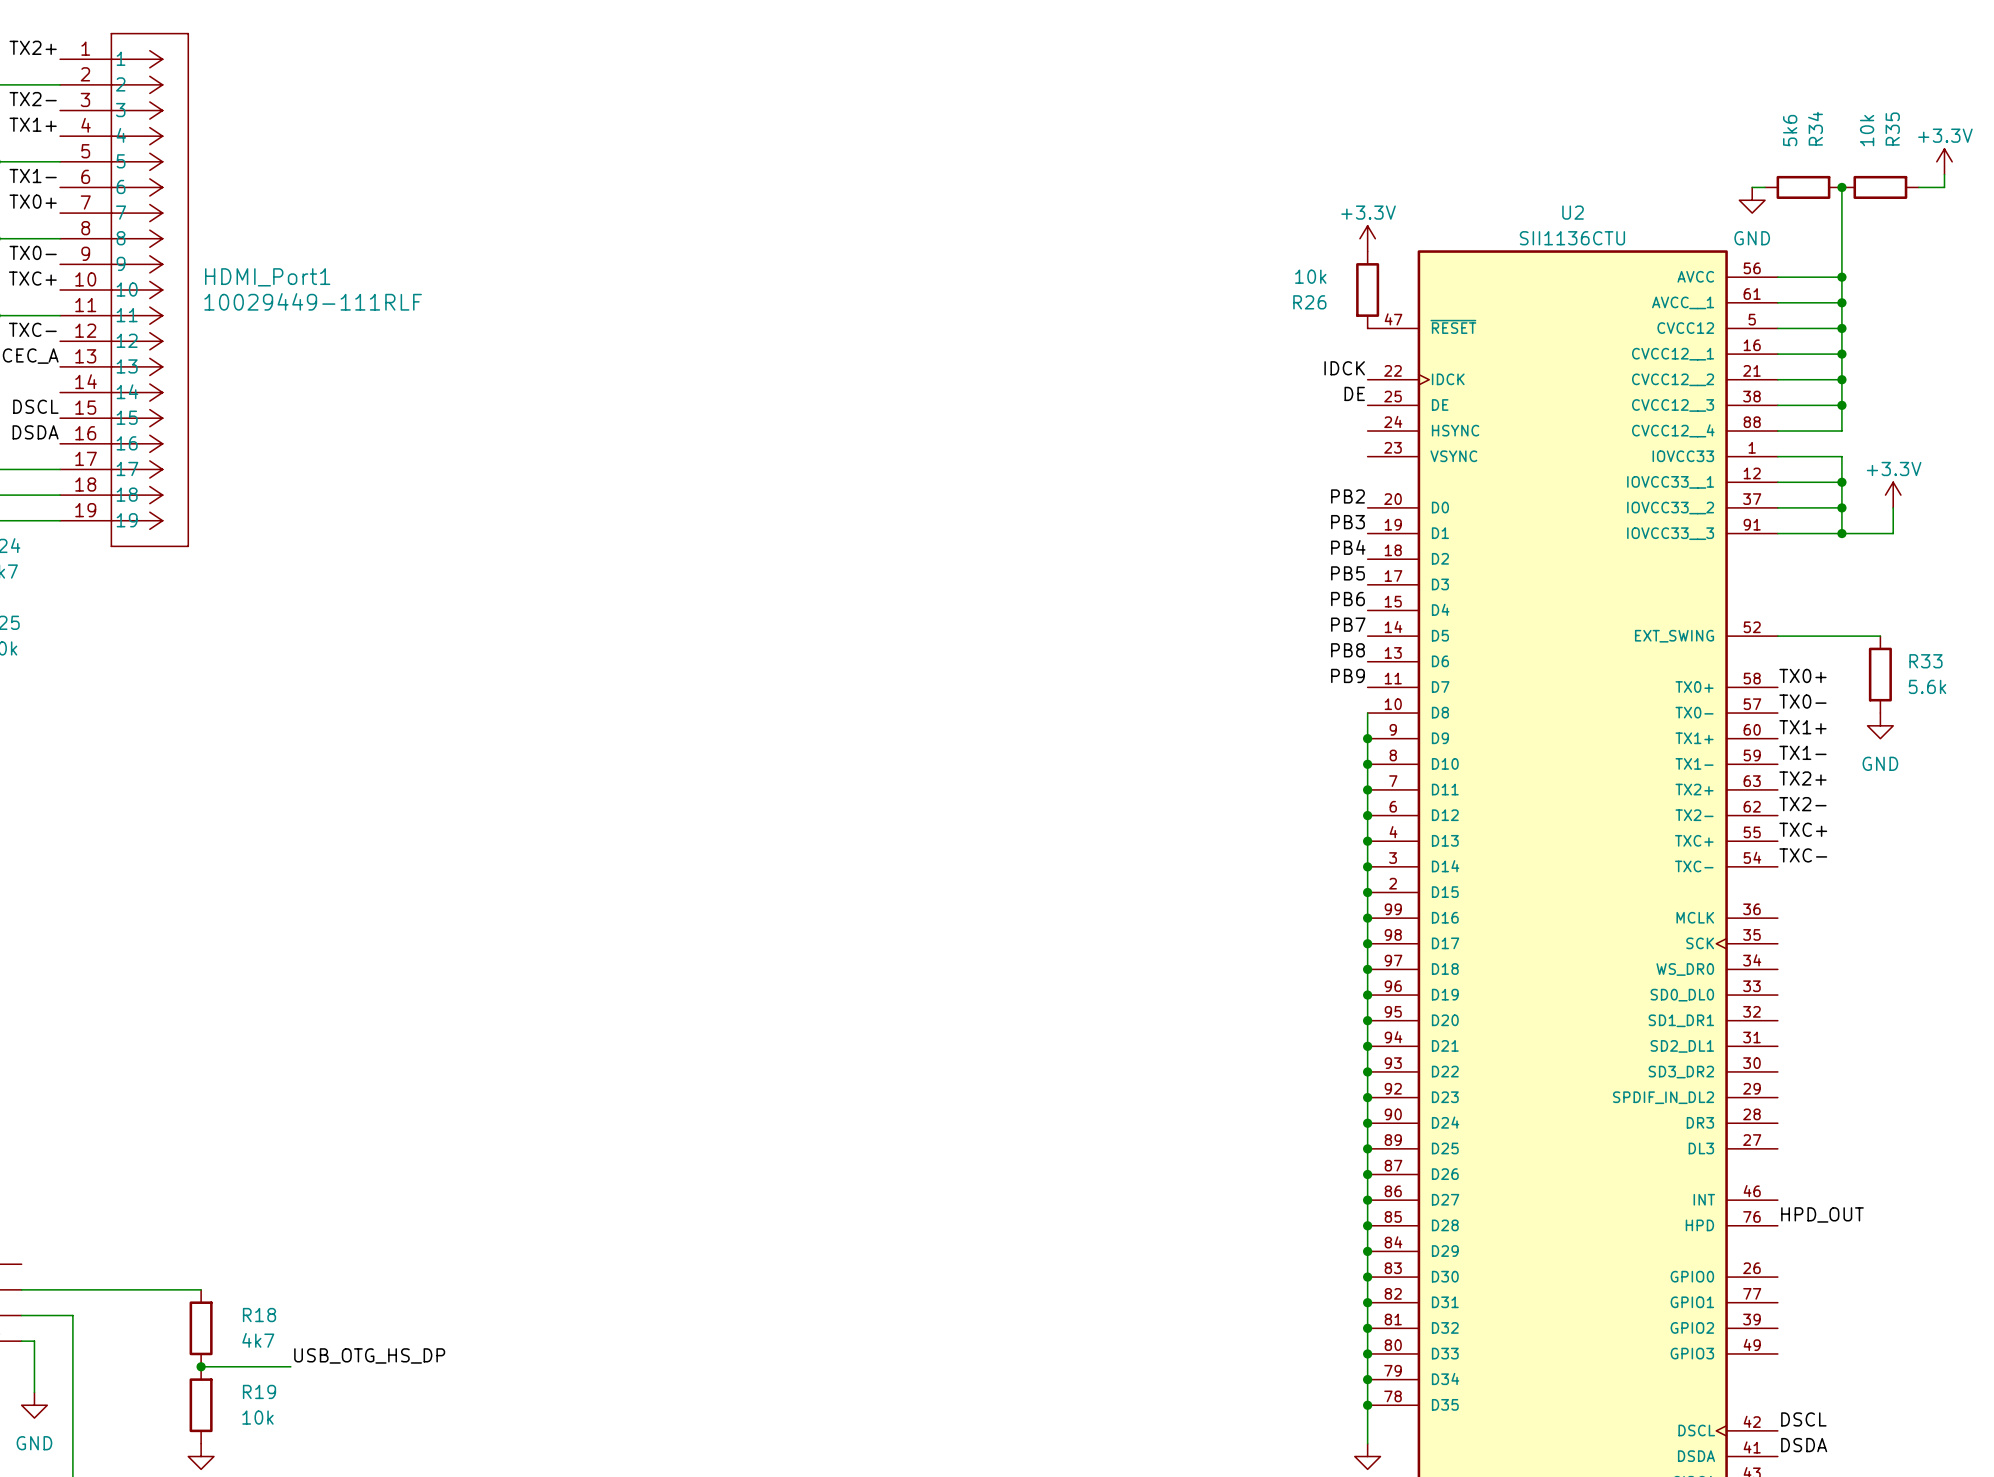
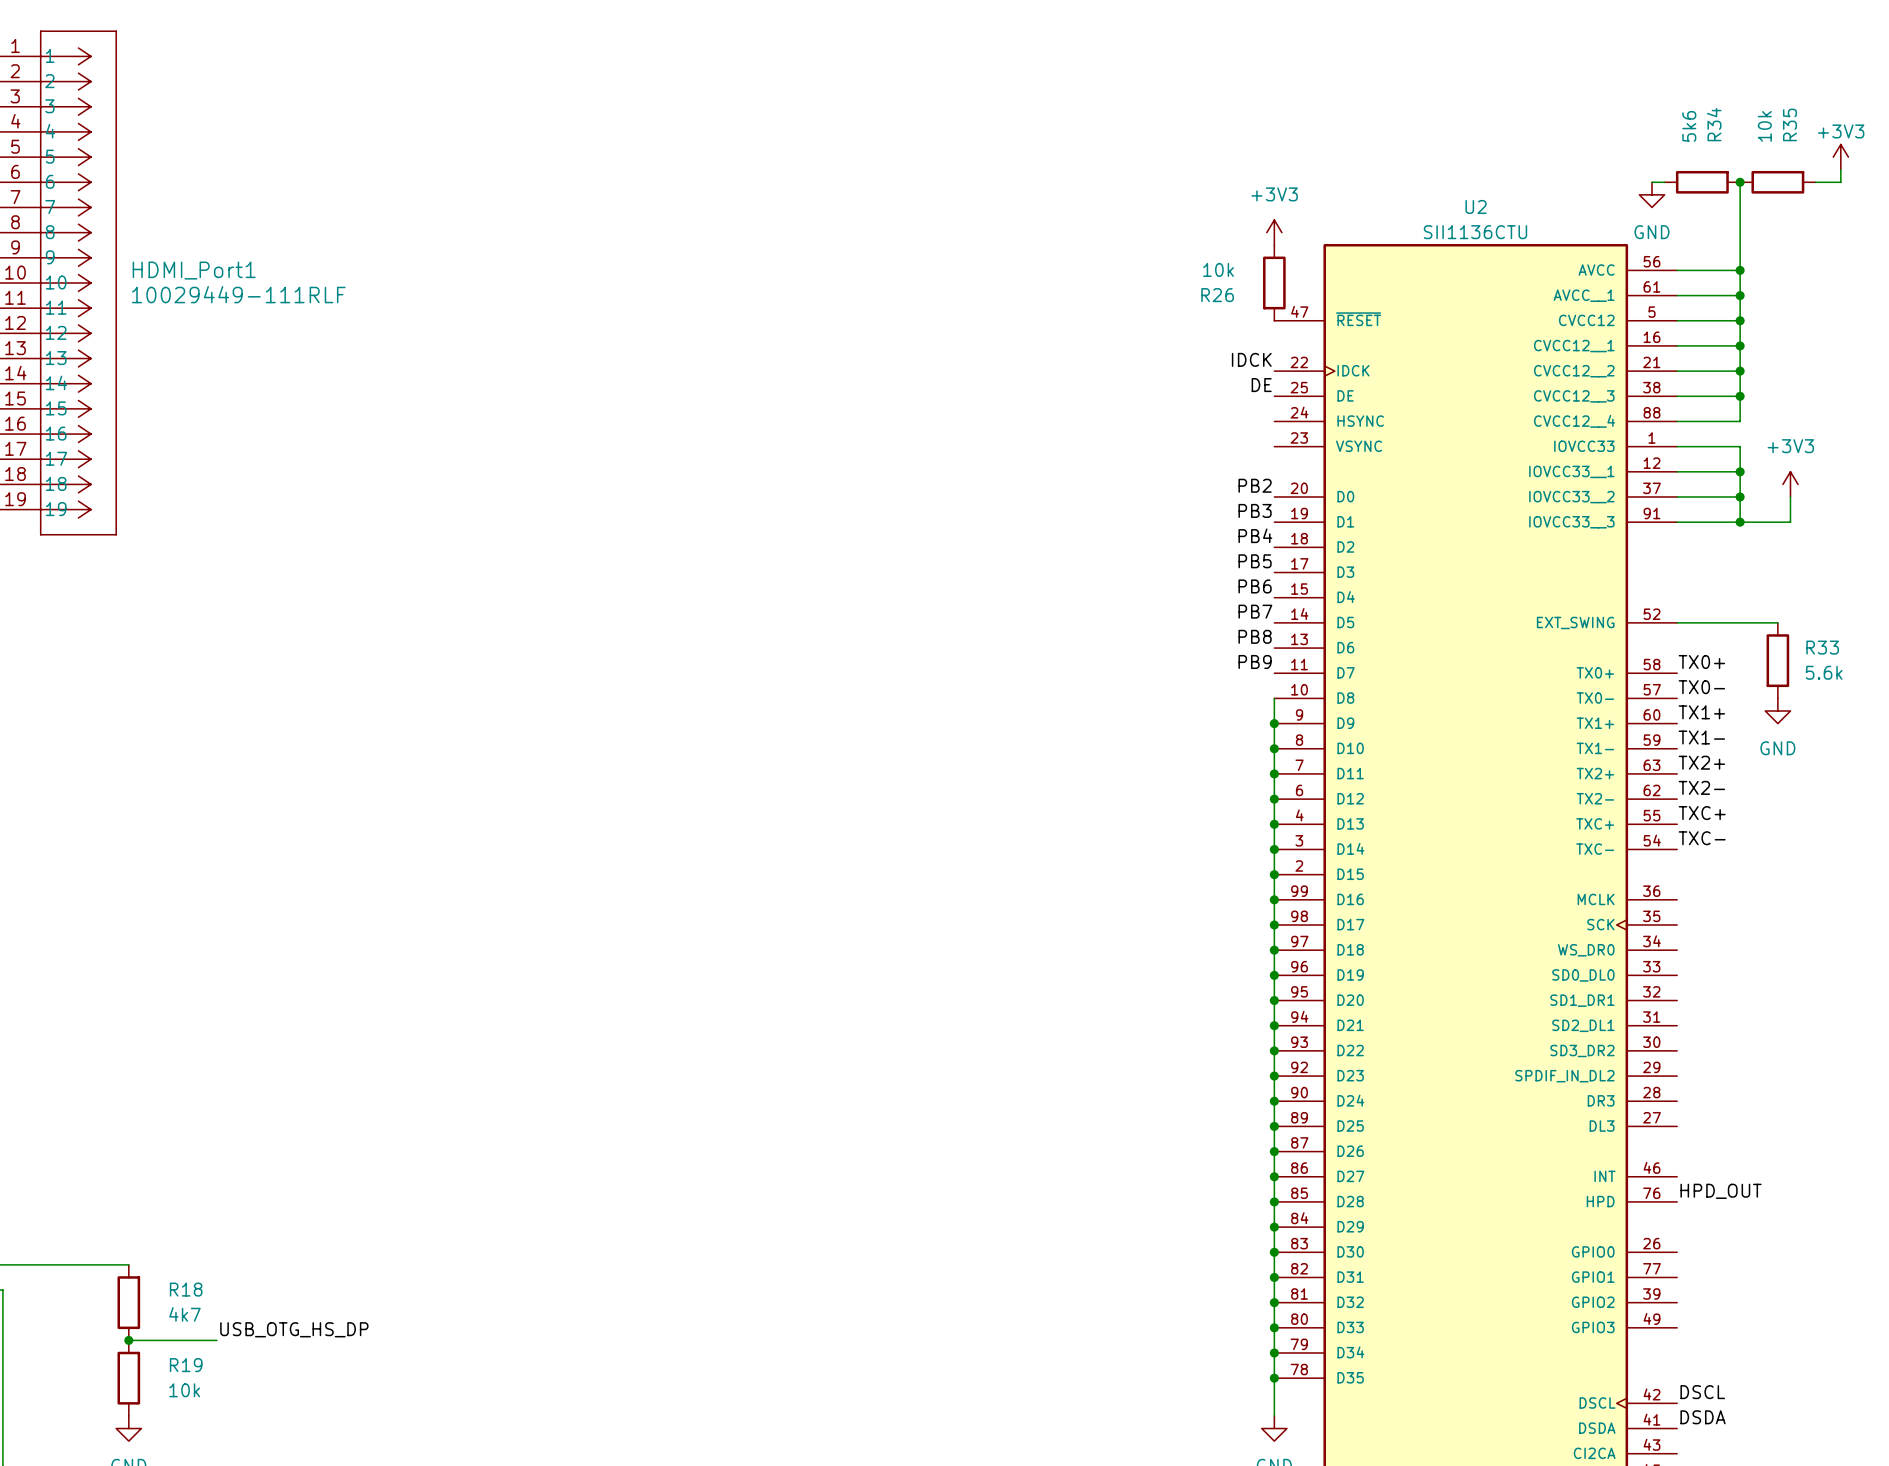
power symbol: +3.3V (1944, 161) -> +3V3 (1840, 157)
power symbol: +3.3V (1367, 238) -> +3V3 (1274, 232)
power symbol: +3.3V (1893, 495) -> +3V3 (1790, 484)

